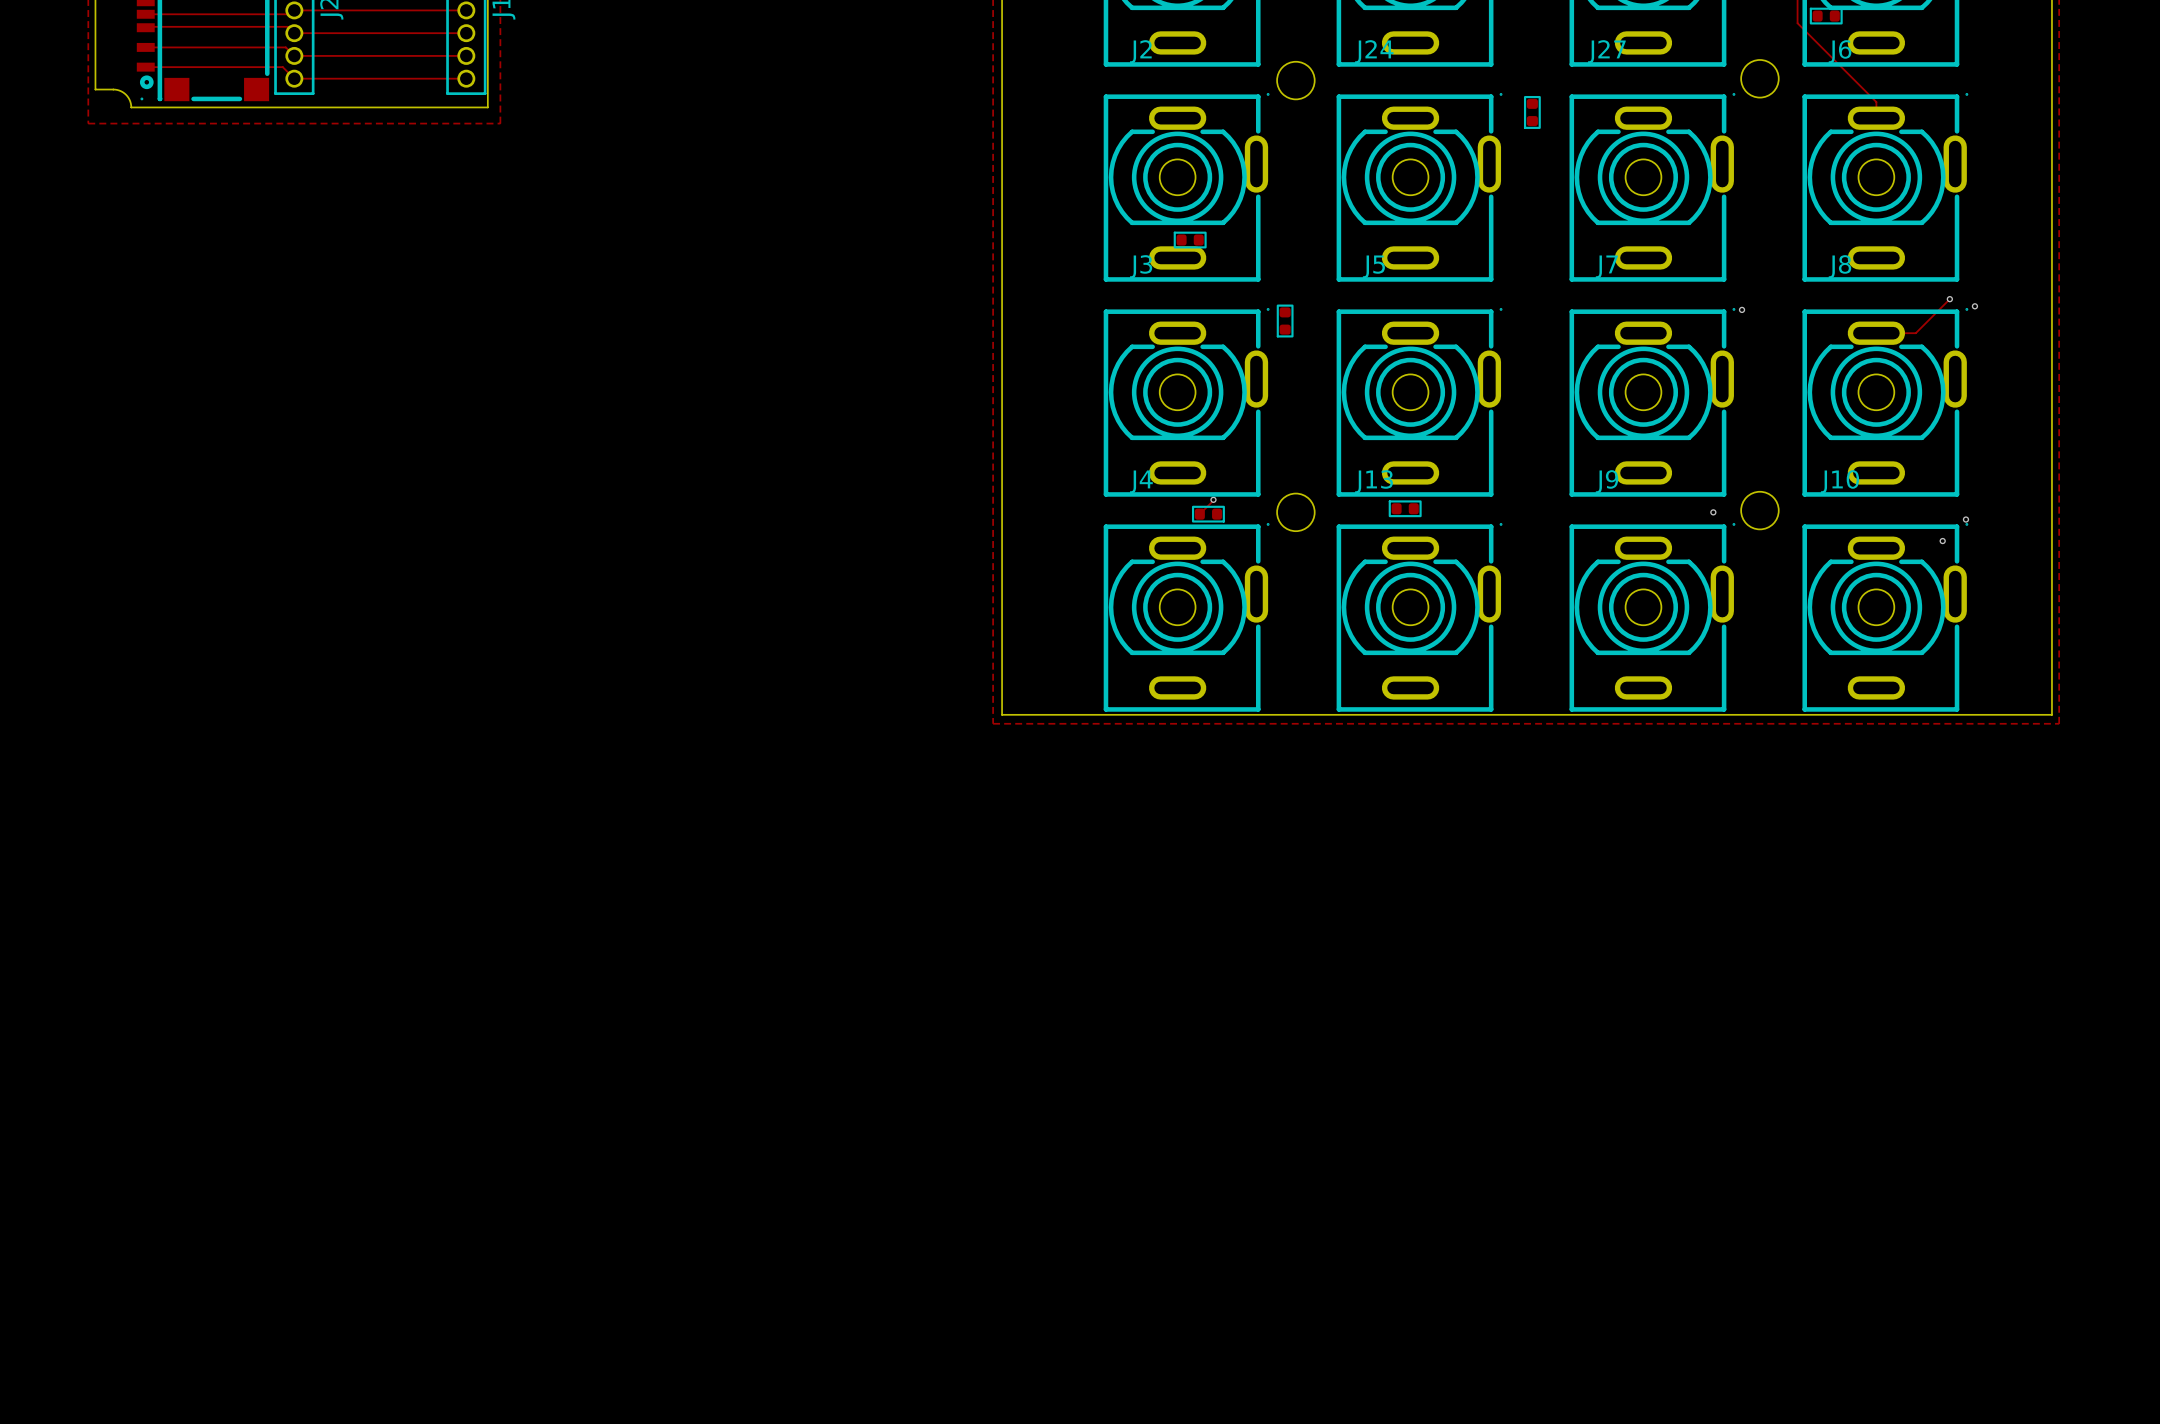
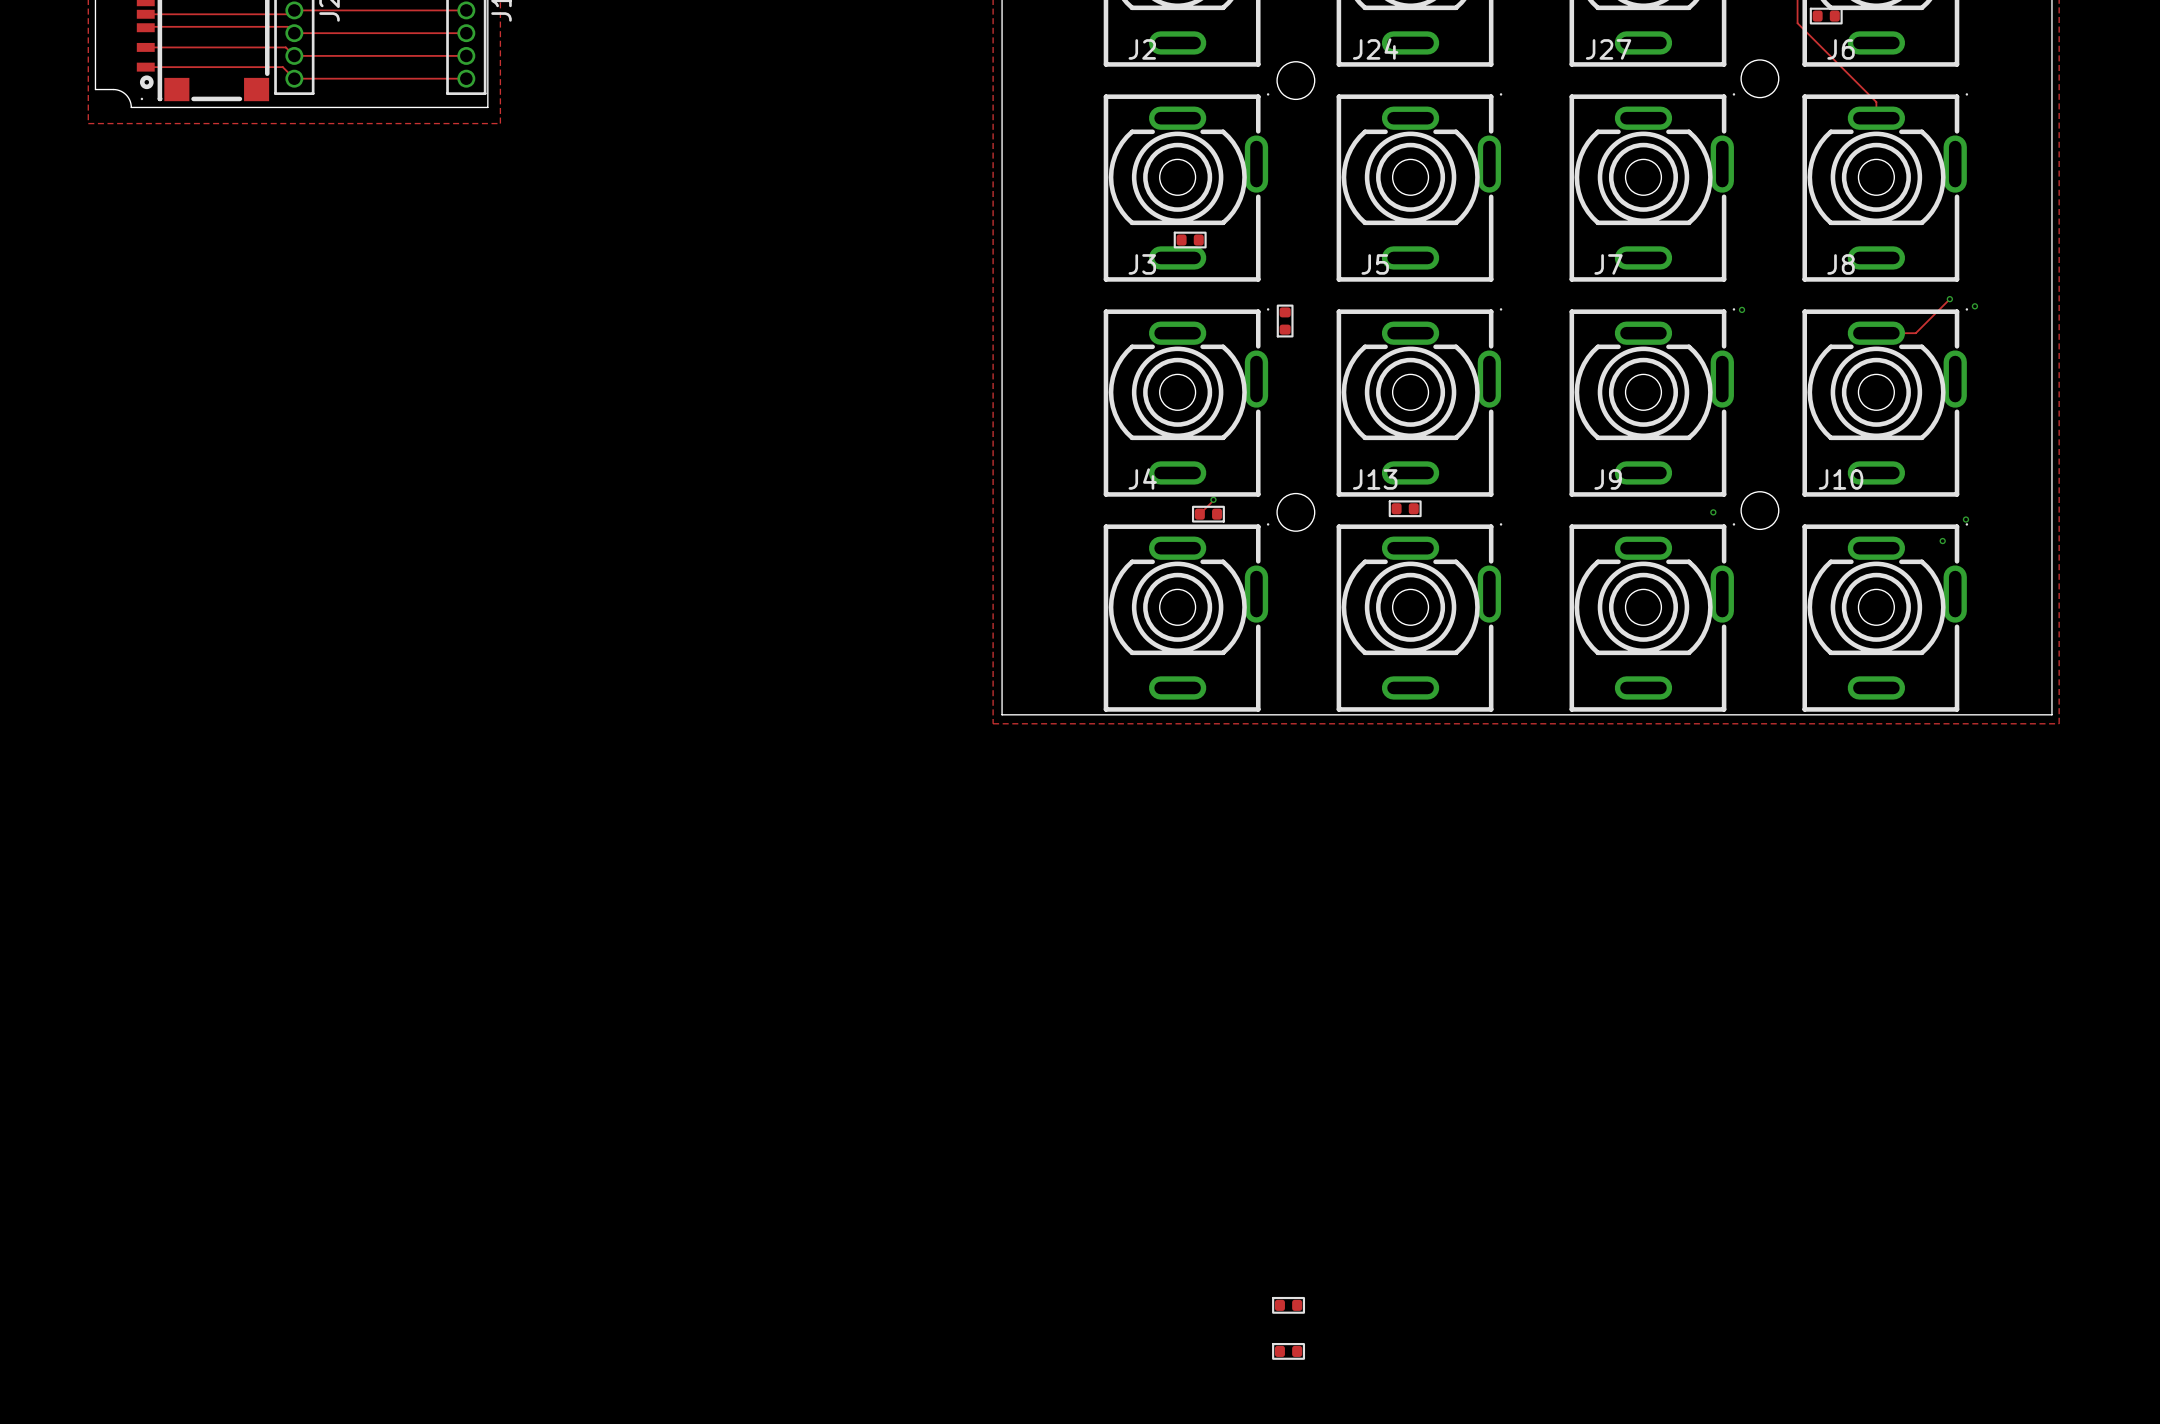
part: (1532, 112) -> none
part: none -> (1288, 1305)
part: none -> (1288, 1351)

